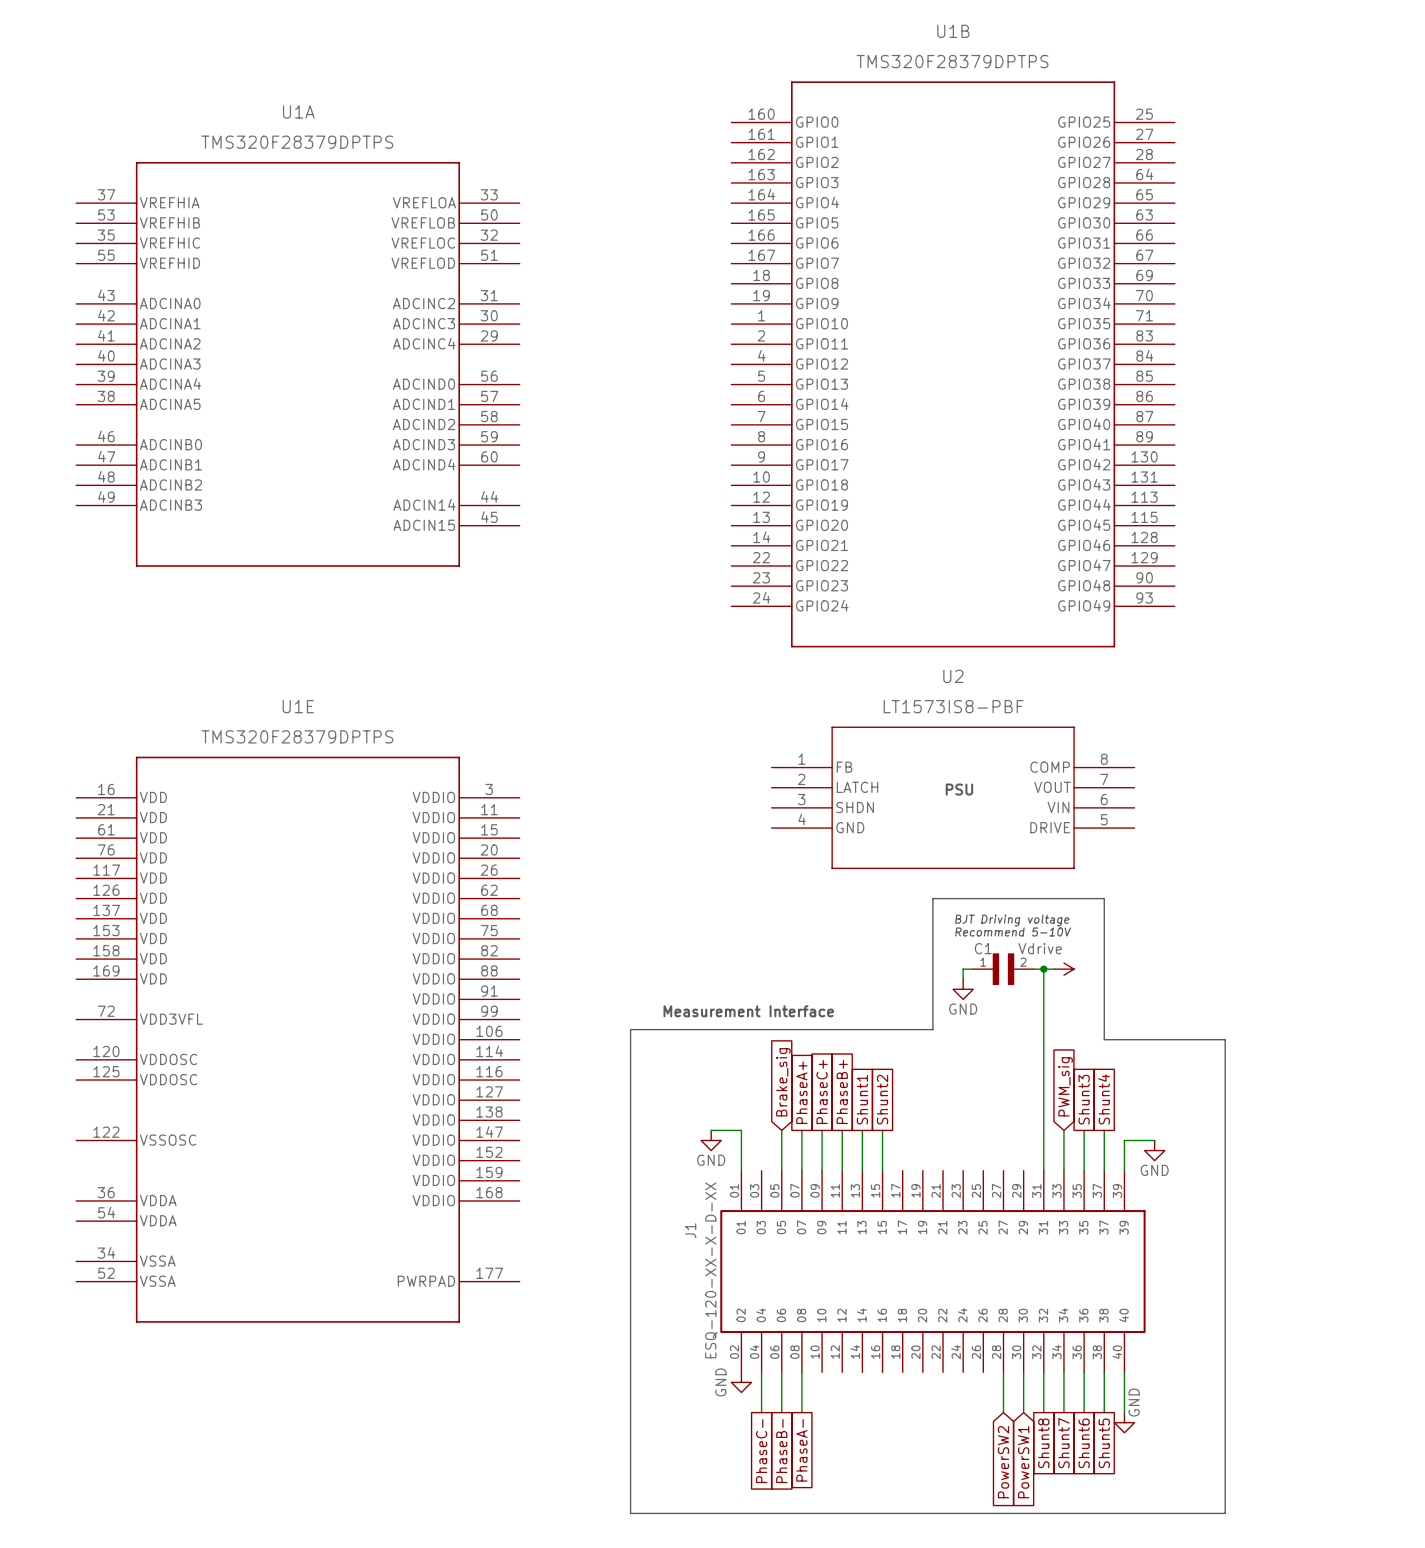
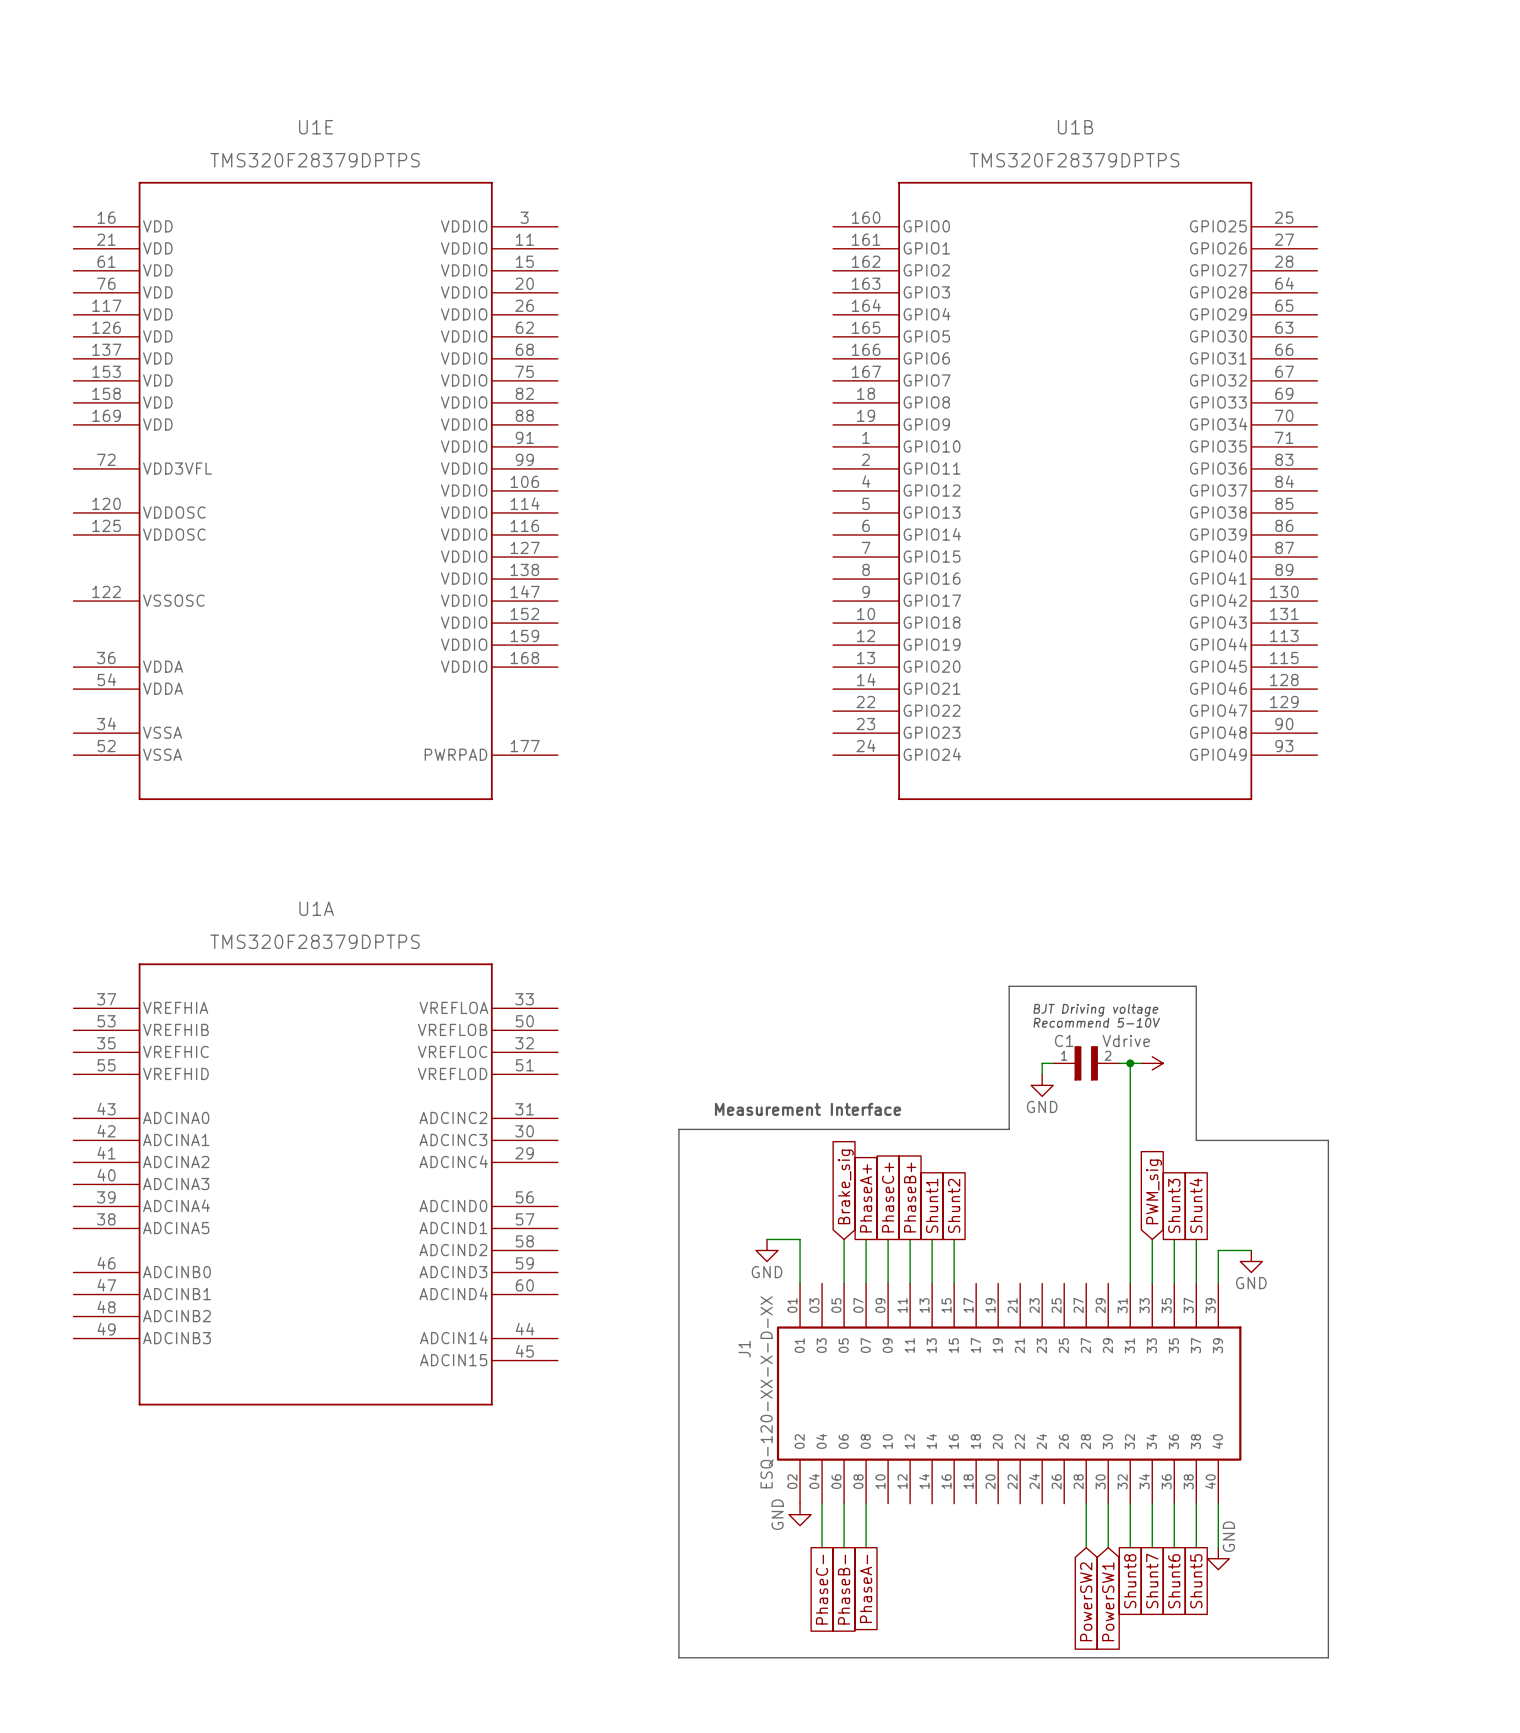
U1A position: (297, 364) -> (315, 1184)
U1B position: (953, 364) -> (1075, 490)
text: PSU (959, 789) -> none
U2: LT1573IS8-PBF (953, 797) -> none
U1E position: (297, 1039) -> (315, 490)

